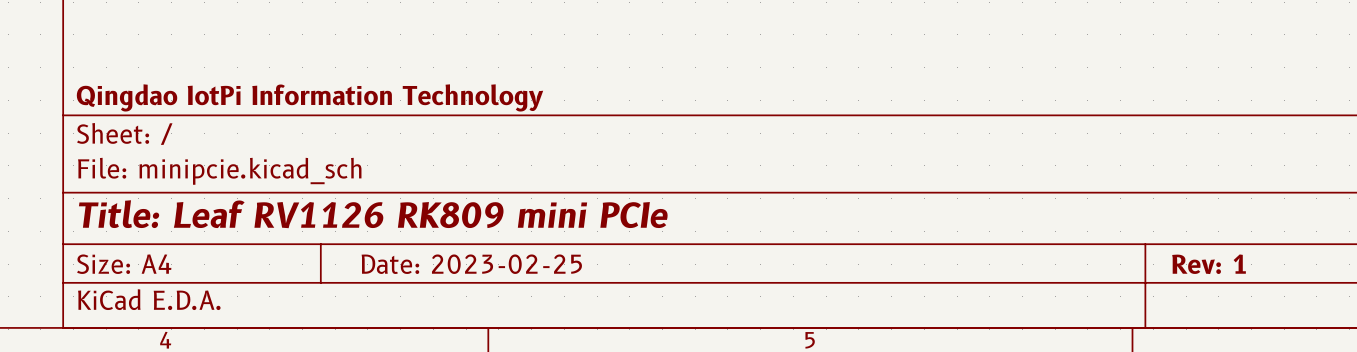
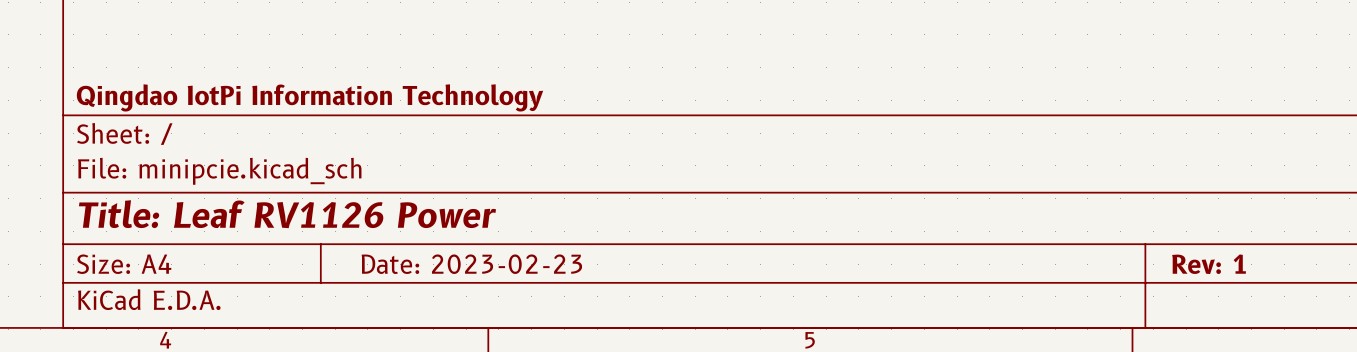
title block: Title: Leaf RV1126 RK809 mini PCIe (373, 214) -> Title: Leaf RV1126 Power (287, 214)
title block: Date: 2023-02-25 (471, 264) -> Date: 2023-02-23 (471, 264)

